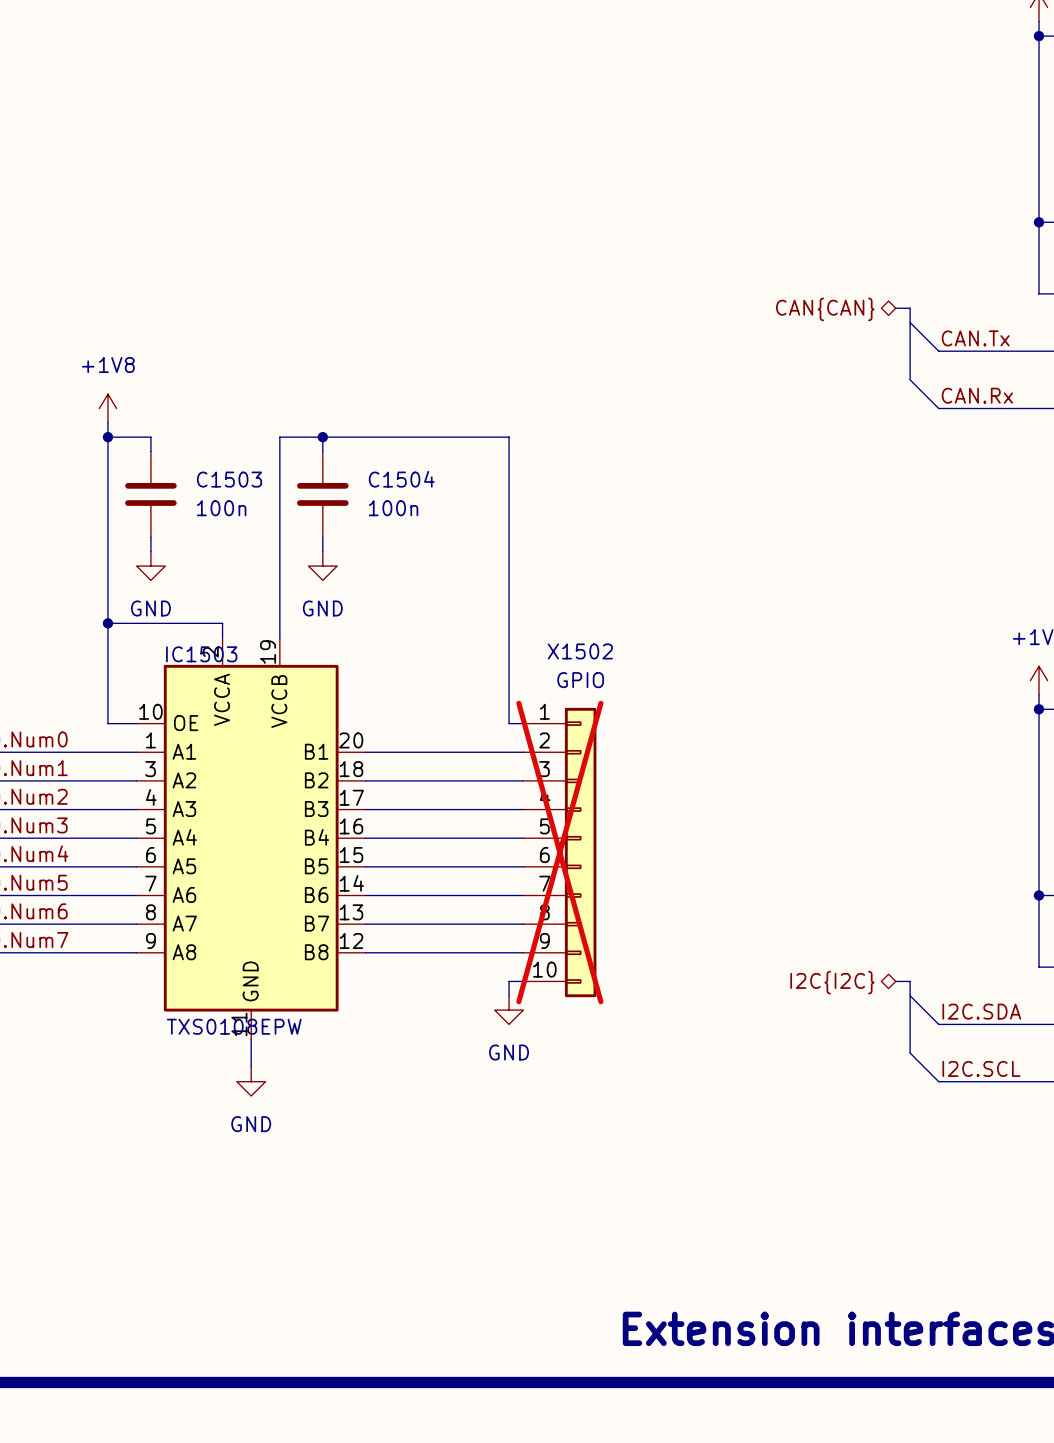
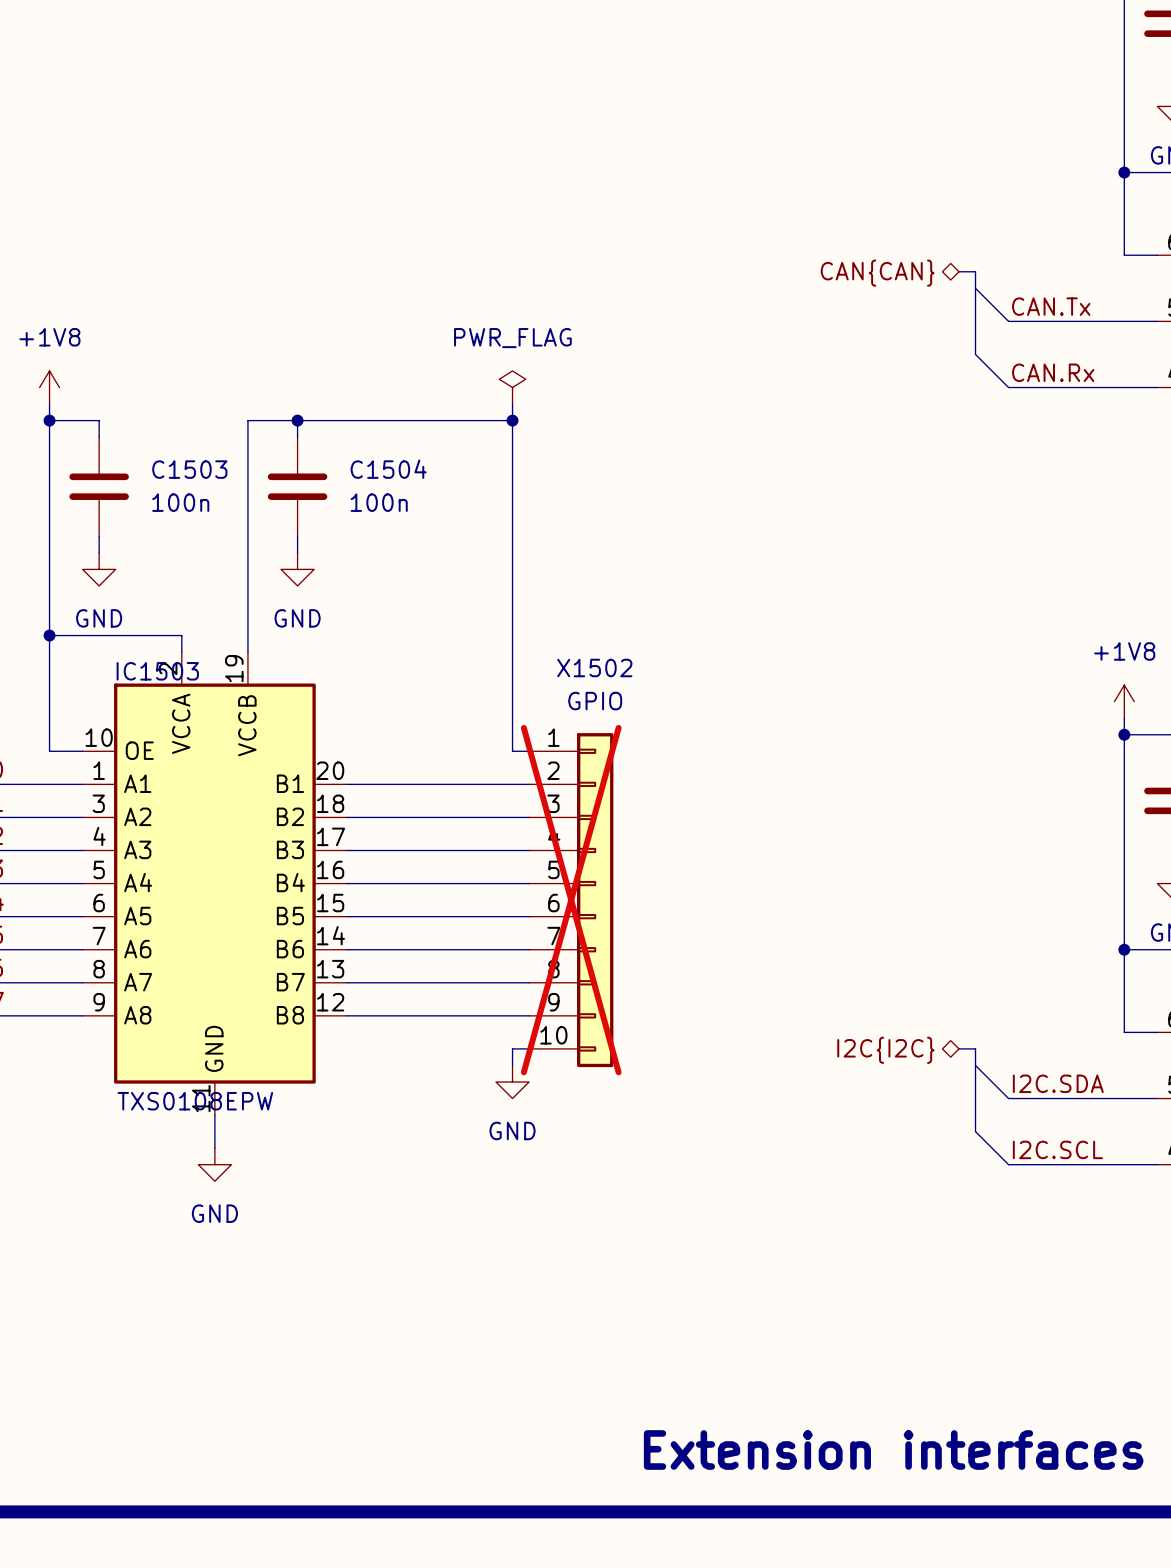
power symbol: none -> PWR_FLAG (512, 387)
wire: none -> (512, 404) (512, 420)
junction: none -> (512, 420)

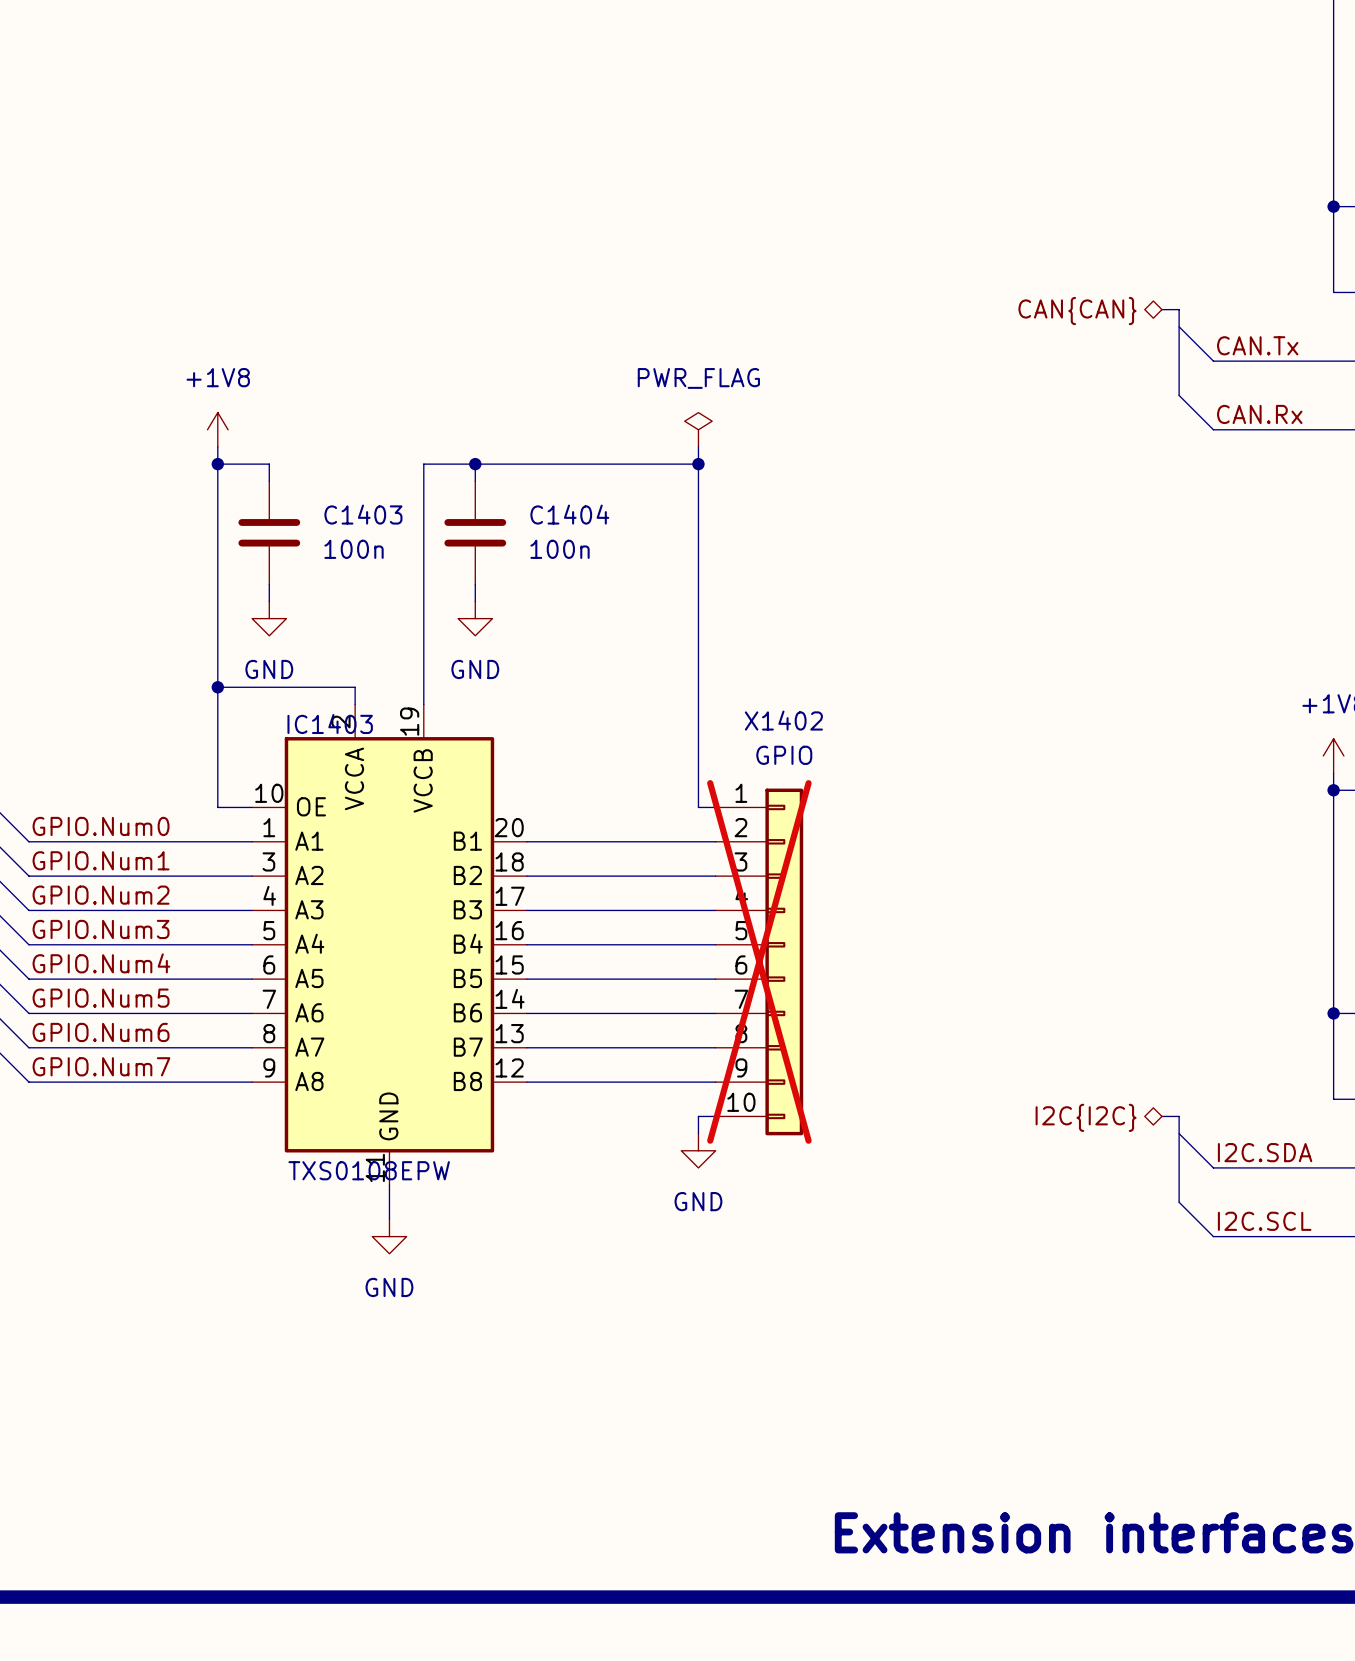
C1503 name: C1503 (189, 469) -> C1403 (363, 514)
C1504 name: C1504 (388, 469) -> C1404 (569, 514)
X1502 name: X1502 (594, 668) -> X1402 (783, 720)
IC1503 name: IC1503 (157, 671) -> IC1403 (330, 724)

